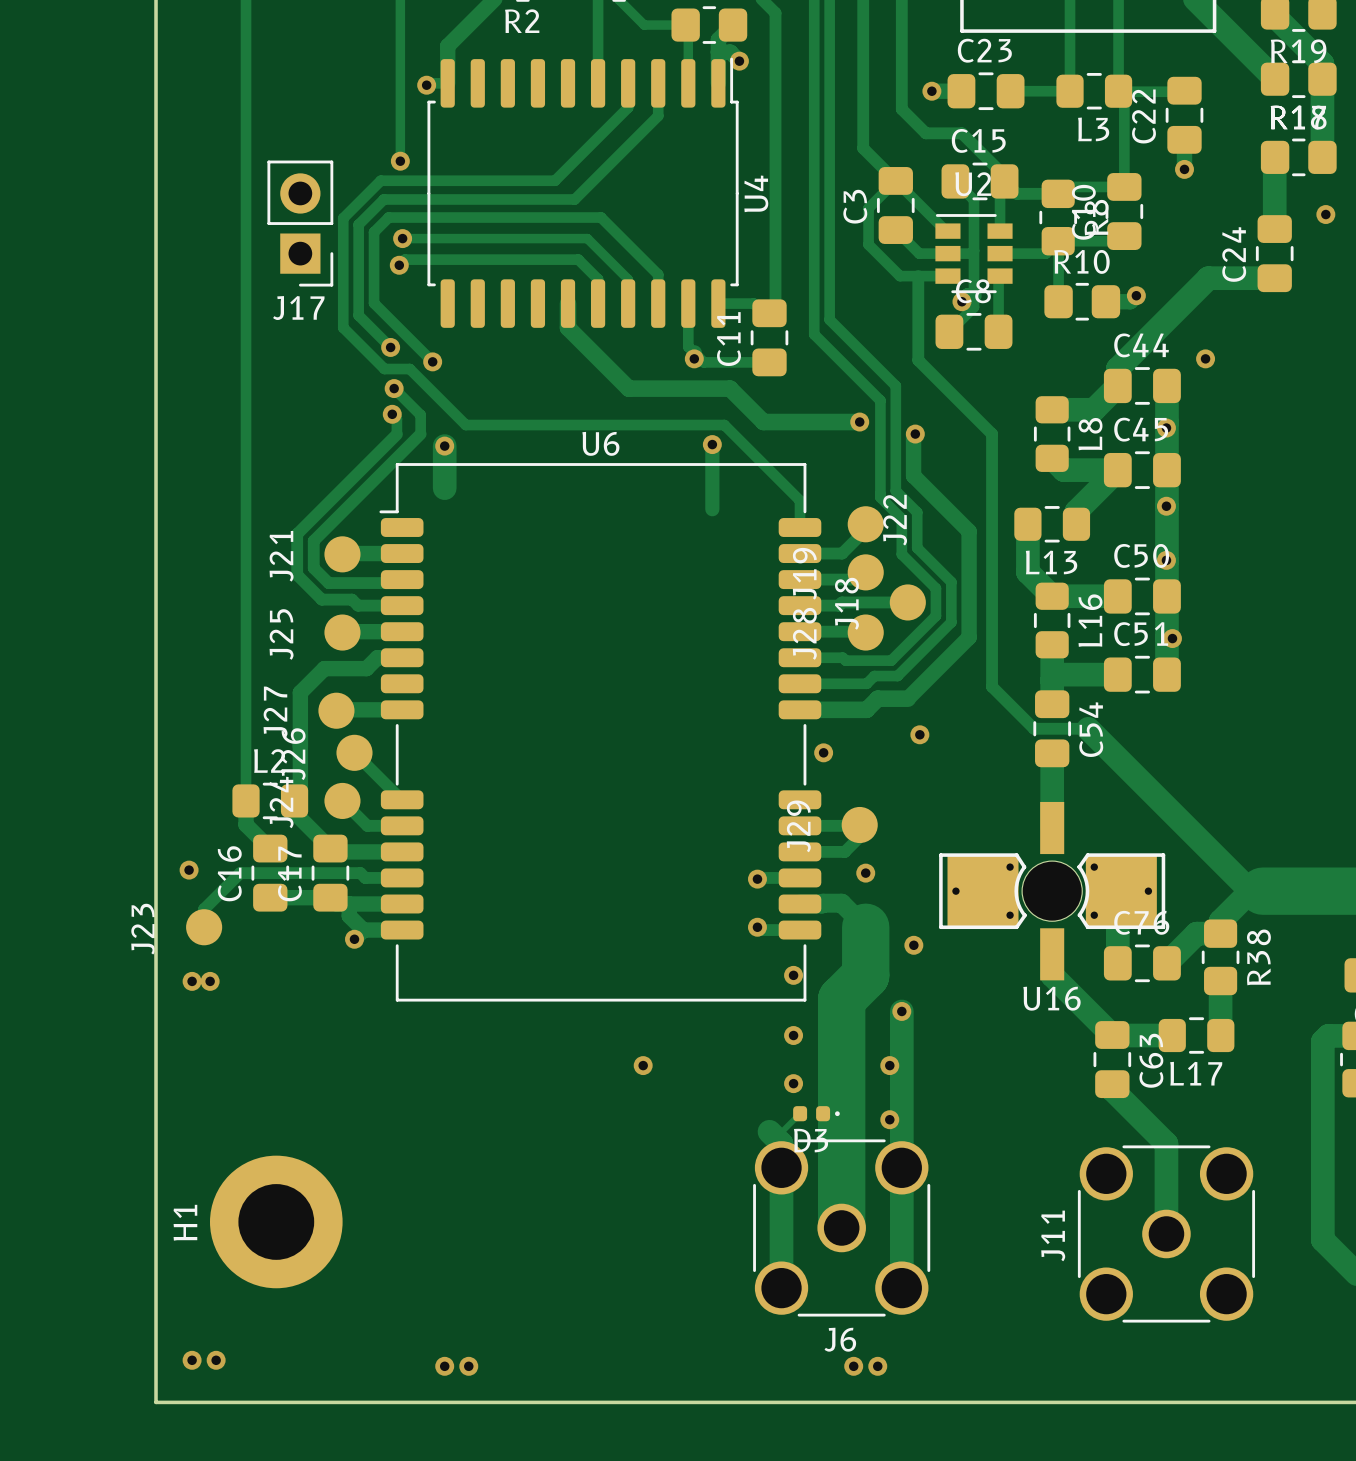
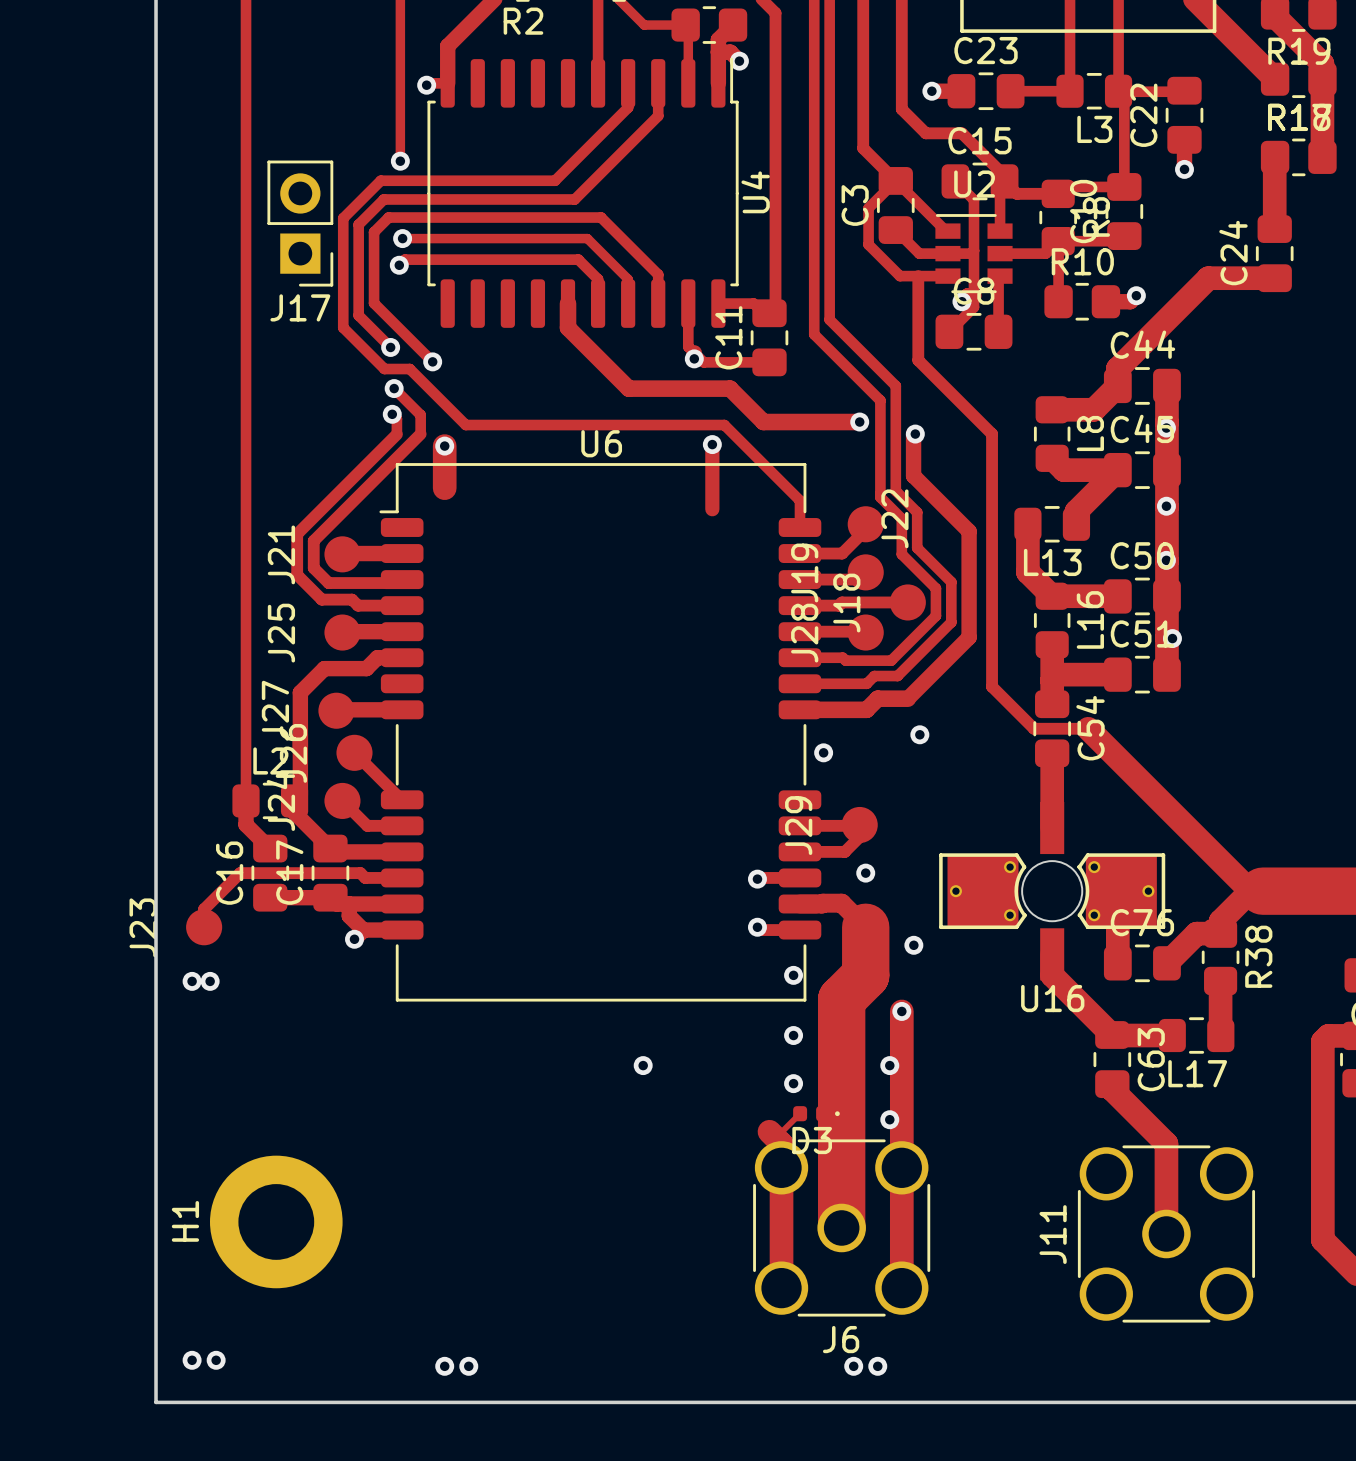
via: (1325, 214) -> none
via: (1205, 358) -> none
via: (189, 870) -> none

